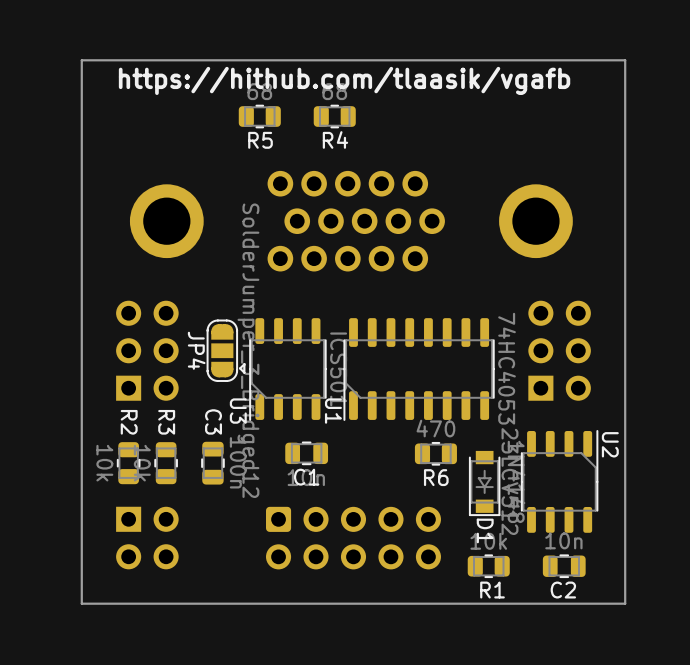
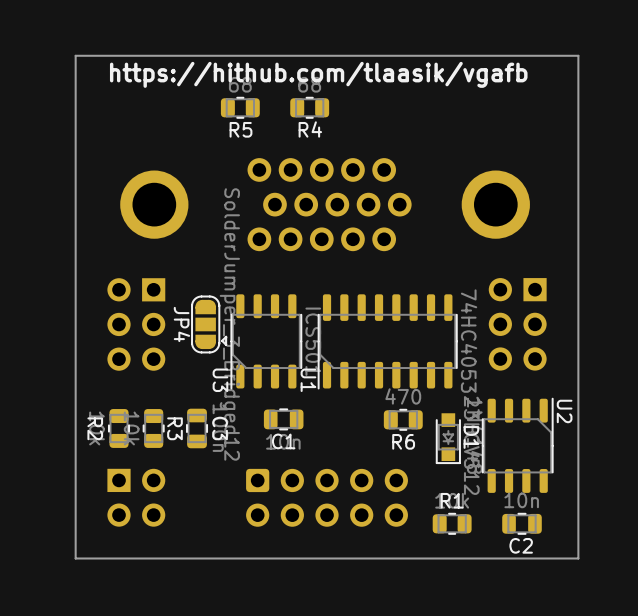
part rotation: 0° (147, 350) -> 180° (136, 324)
part rotation: 0° (559, 350) -> 180° (517, 324)
C3 name position: C3 (213, 421) -> C3 (220, 428)
R2 name position: R2 (129, 422) -> R2 (95, 428)
R3 name position: R3 (166, 422) -> R3 (174, 428)
D1 footprint: [469, 450, 501, 516] -> [435, 413, 461, 464]
D1 name position: D1 (485, 530) -> D1 (471, 437)
R1 name position: R1 (492, 590) -> R1 (452, 500)

